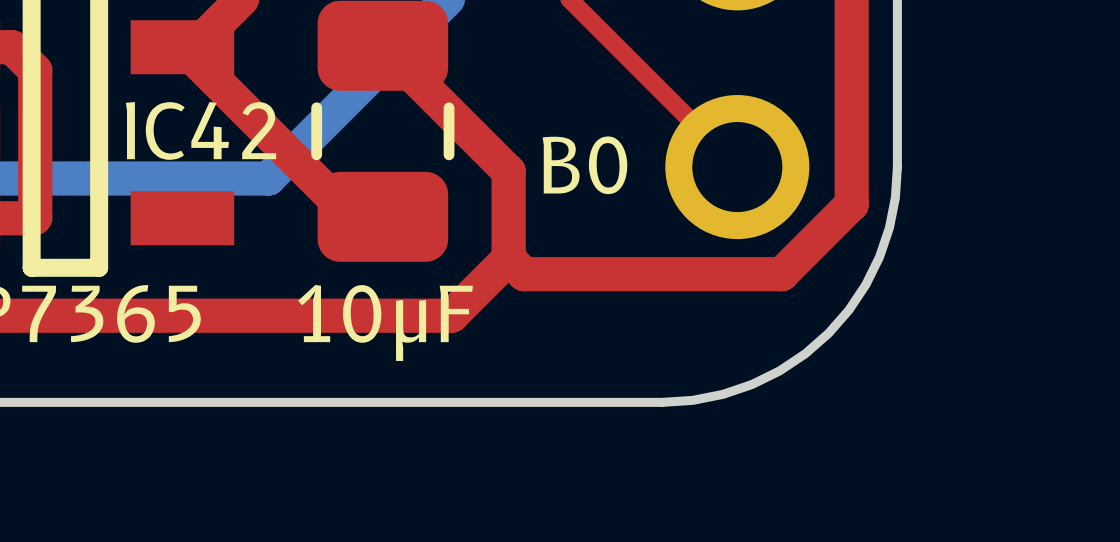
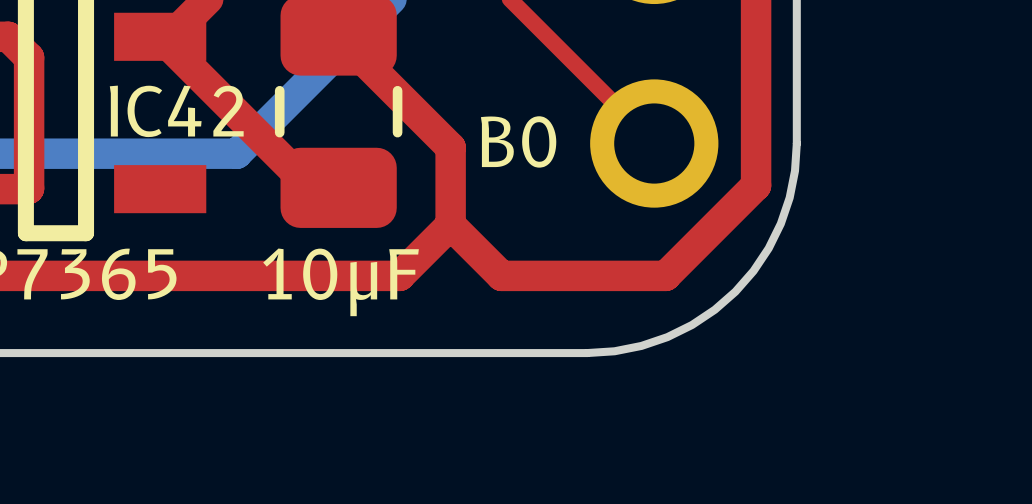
top track: (851, 204) (781, 274) (524, 274) -> (756, 176) (756, 185) (665, 275) (501, 275) (464, 238)

